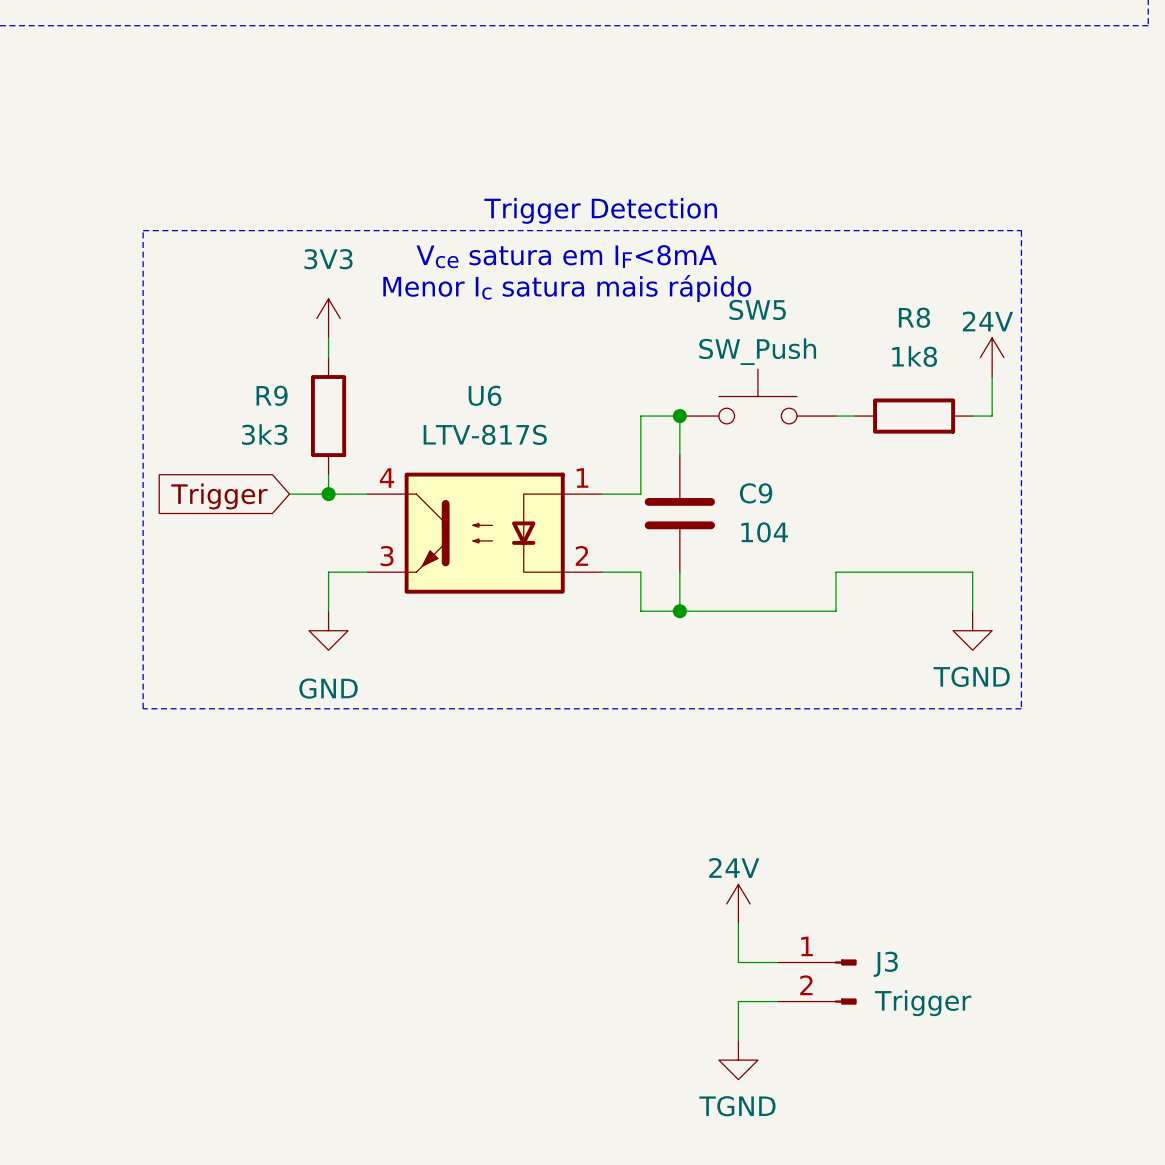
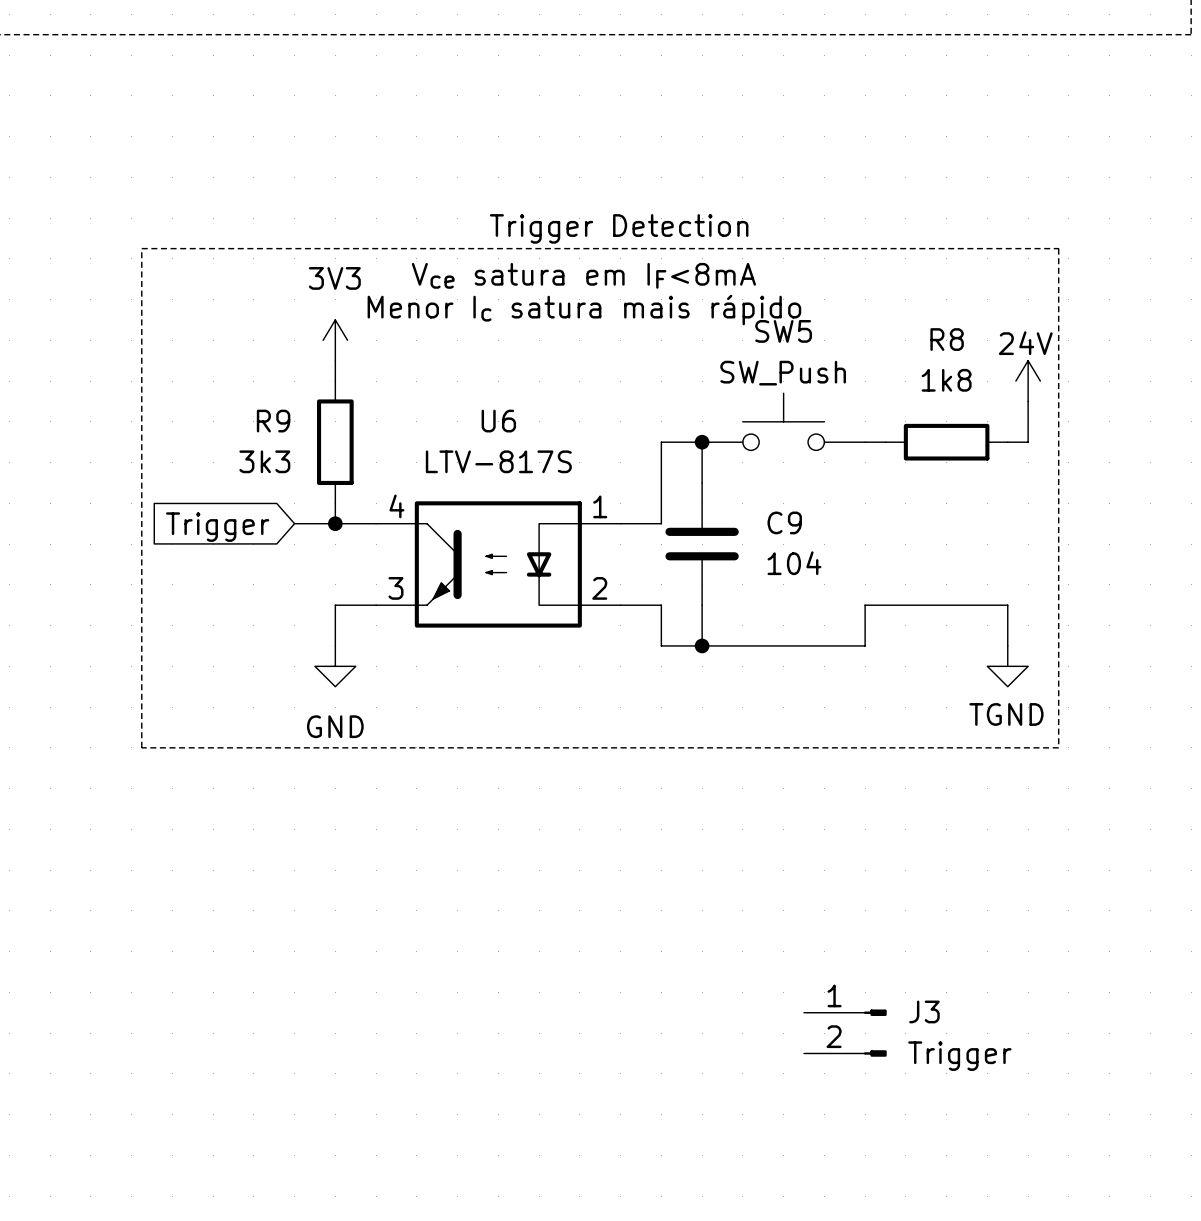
power symbol: 24V (738, 903) -> none
wire: (738, 923) (738, 962) (777, 962) -> none
wire: (777, 1001) (738, 1001) (738, 1040) -> none
power symbol: TGND (738, 1060) -> none

